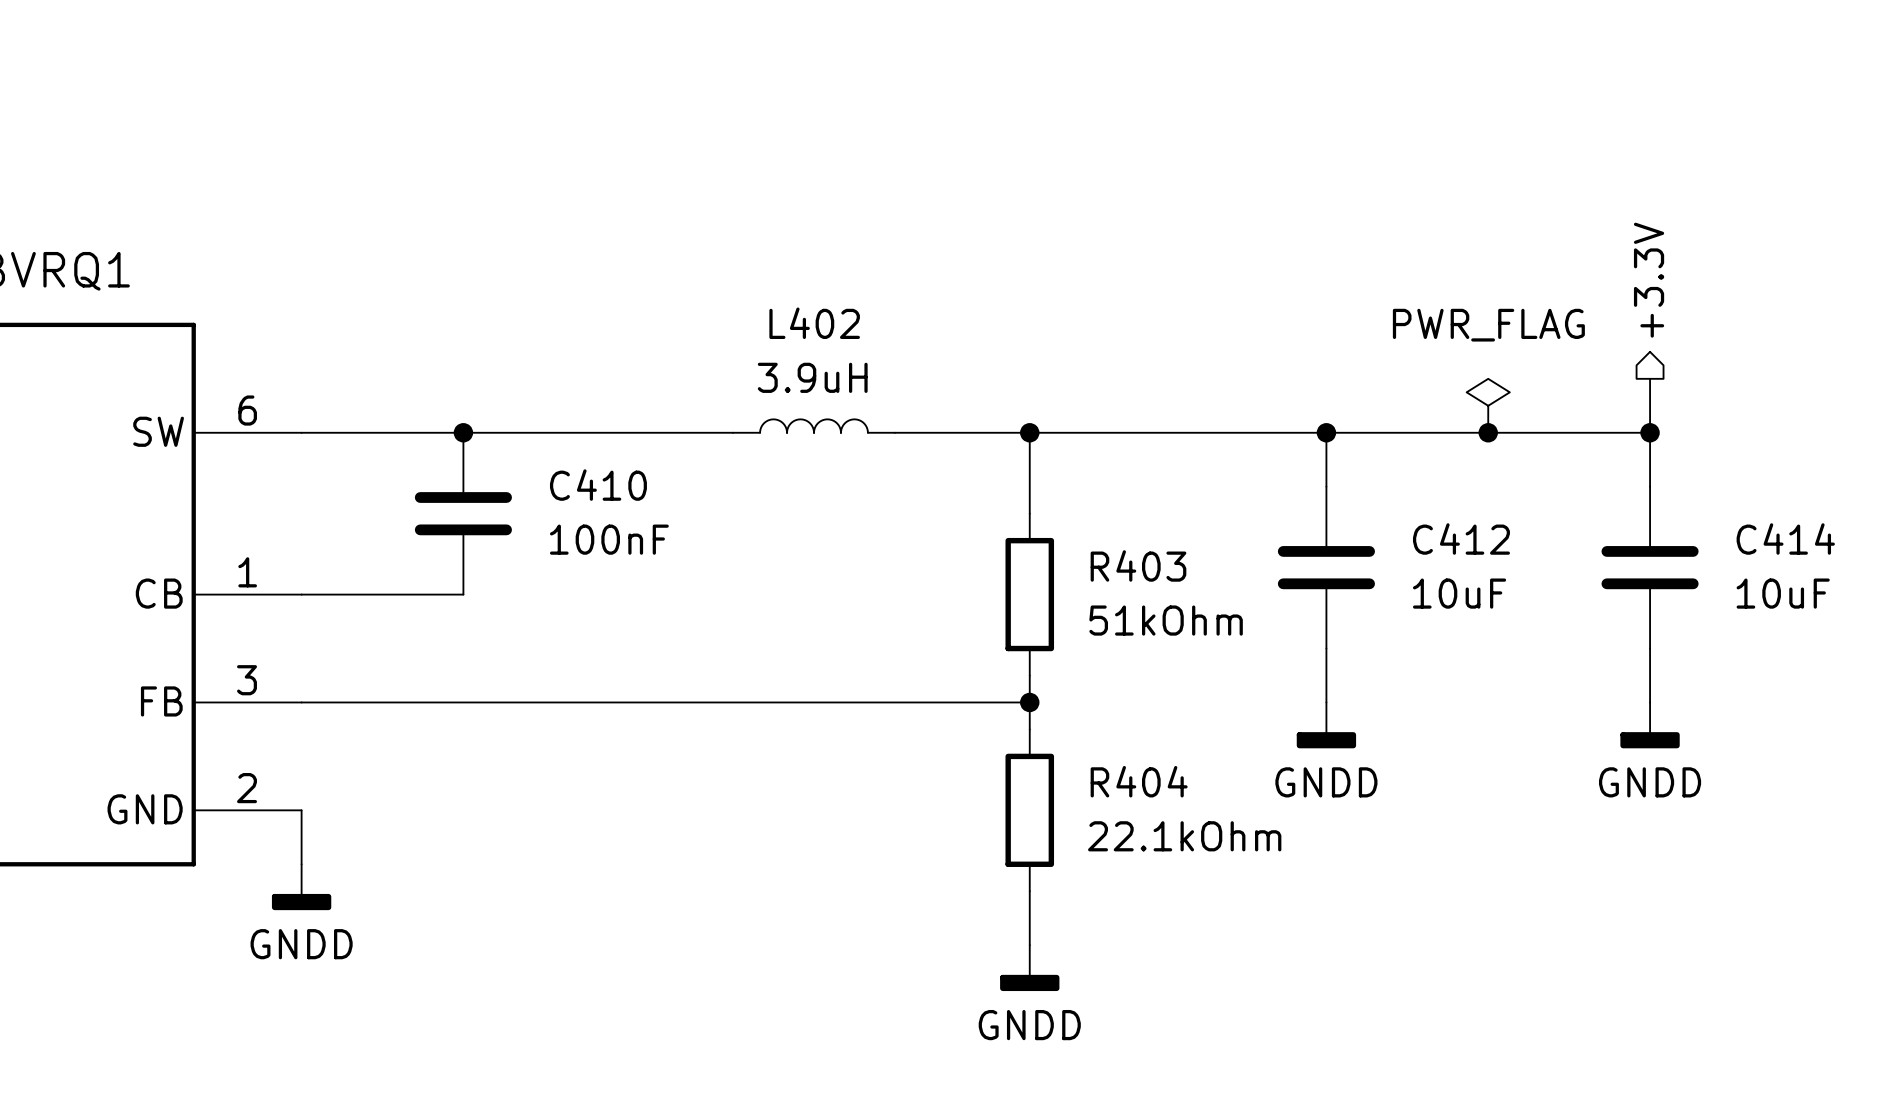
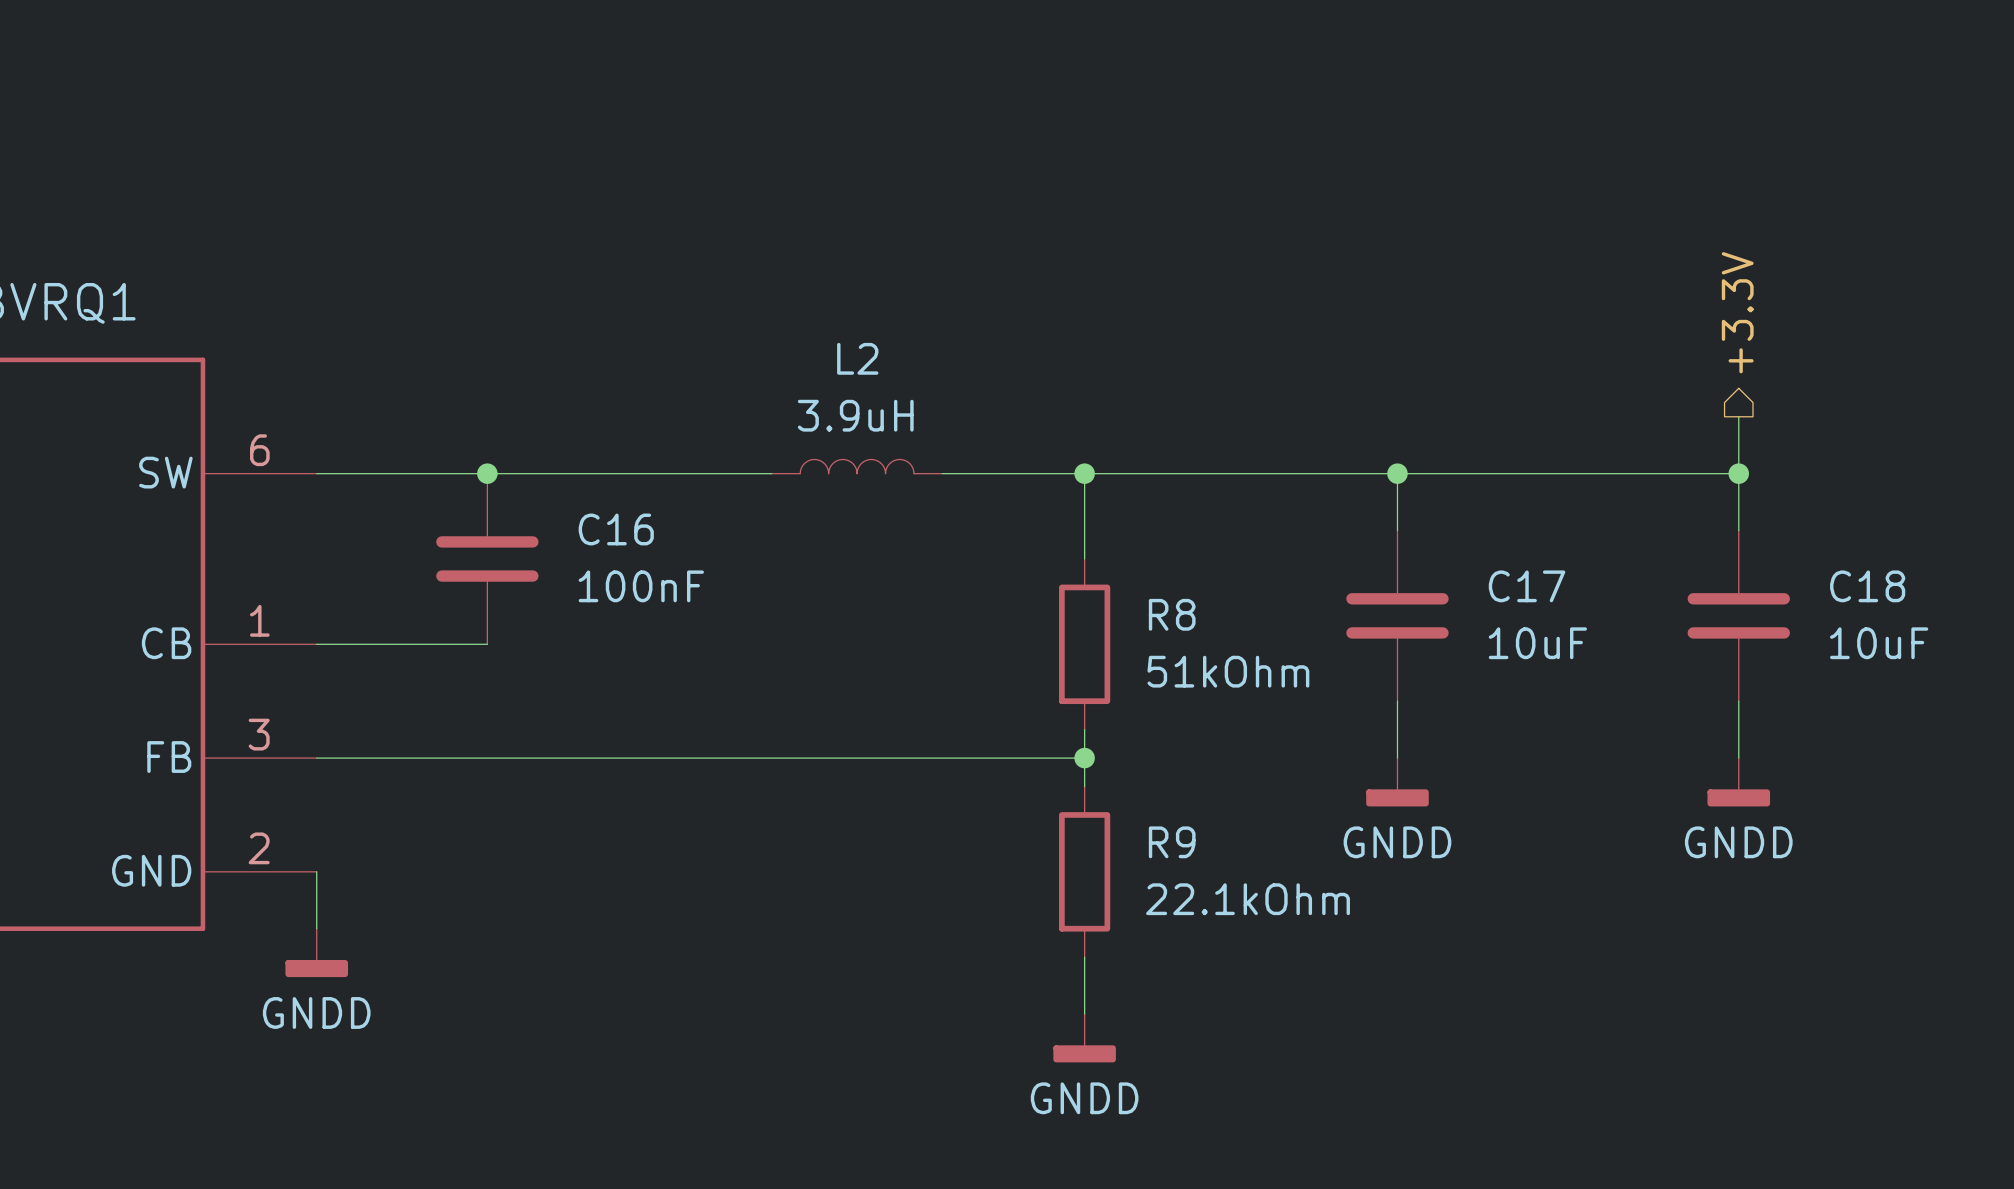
L402 name: L402 (814, 323) -> L2 (857, 358)
power symbol: PWR_FLAG (1488, 405) -> none
junction: (1488, 432) -> none
C410 name: C410 (598, 485) -> C16 (616, 529)
C412 name: C412 (1461, 539) -> C17 (1527, 586)
C414 name: C414 (1785, 539) -> C18 (1867, 586)
R403 name: R403 (1138, 565) -> R8 (1172, 614)
R404 name: R404 (1139, 781) -> R9 (1172, 842)

